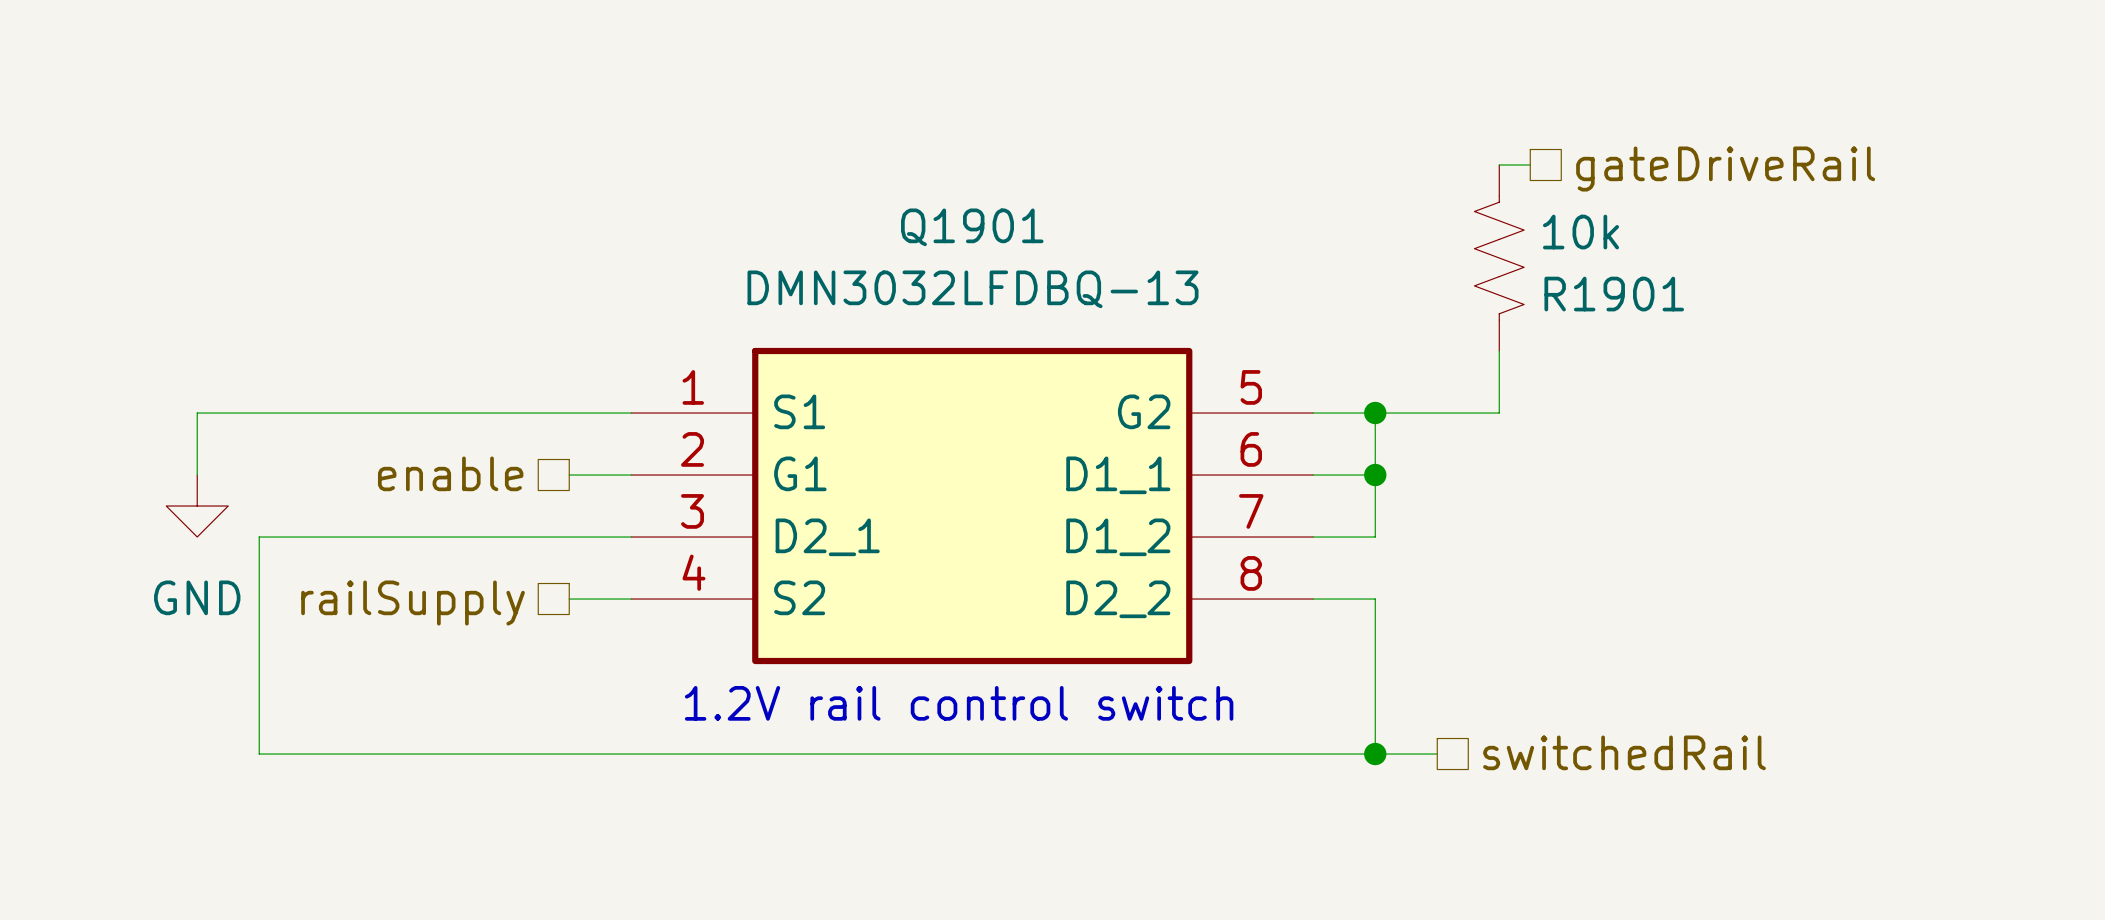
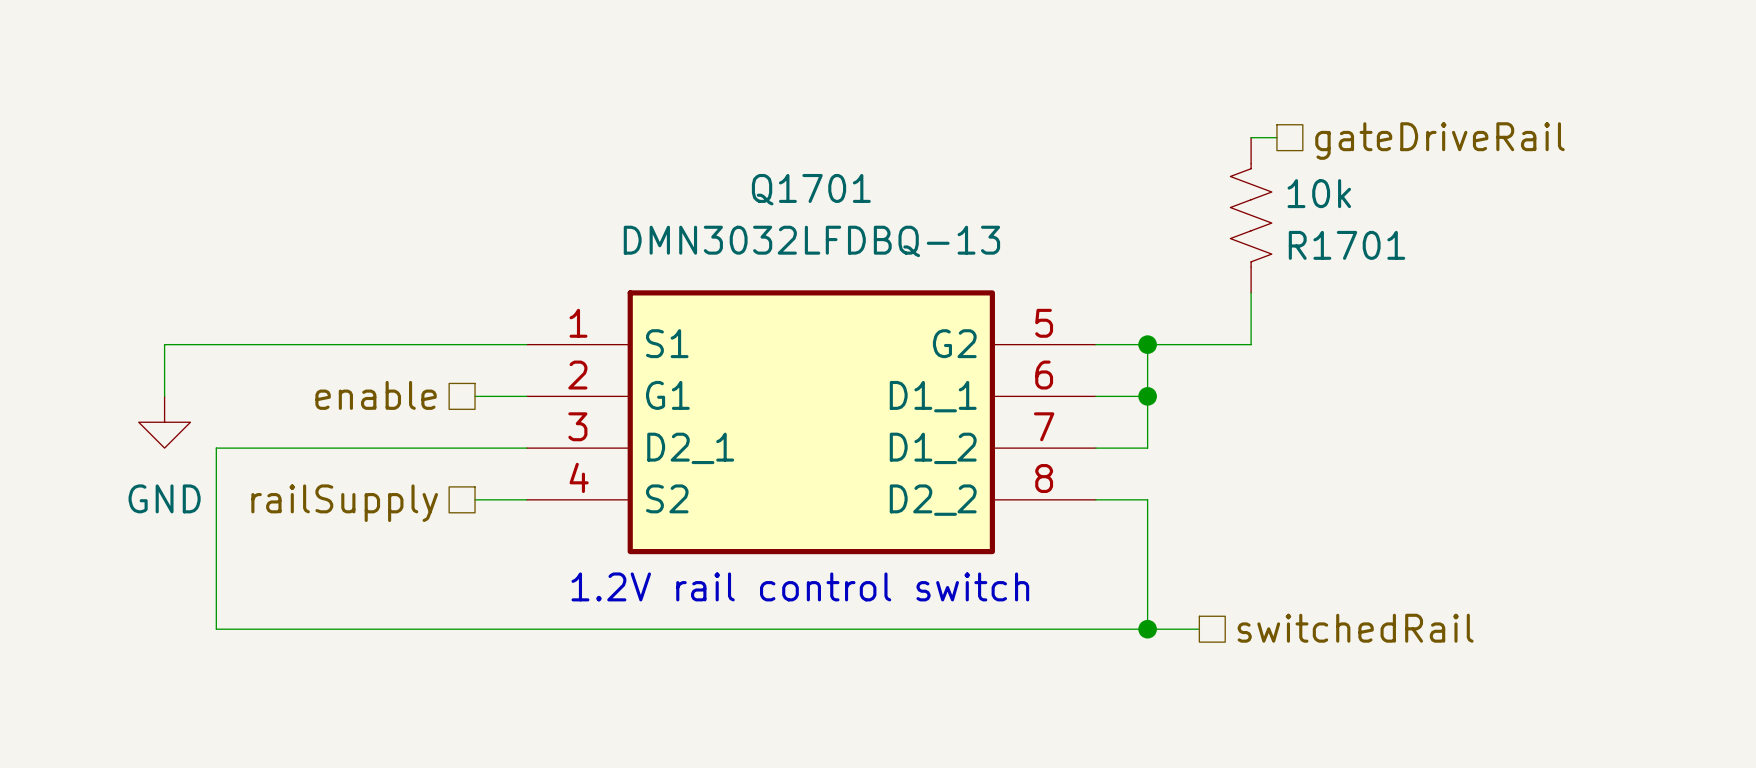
Q1901 name: Q1901 (972, 227) -> Q1701 (811, 189)
R1901 name: R1901 (1614, 294) -> R1701 (1347, 245)

